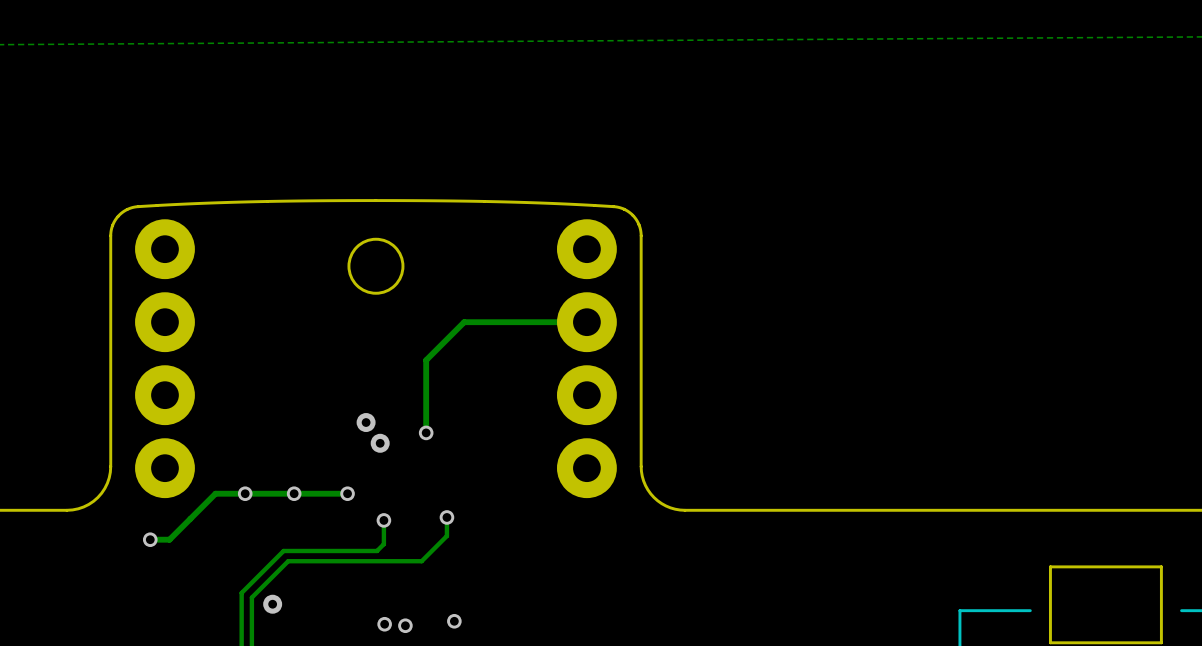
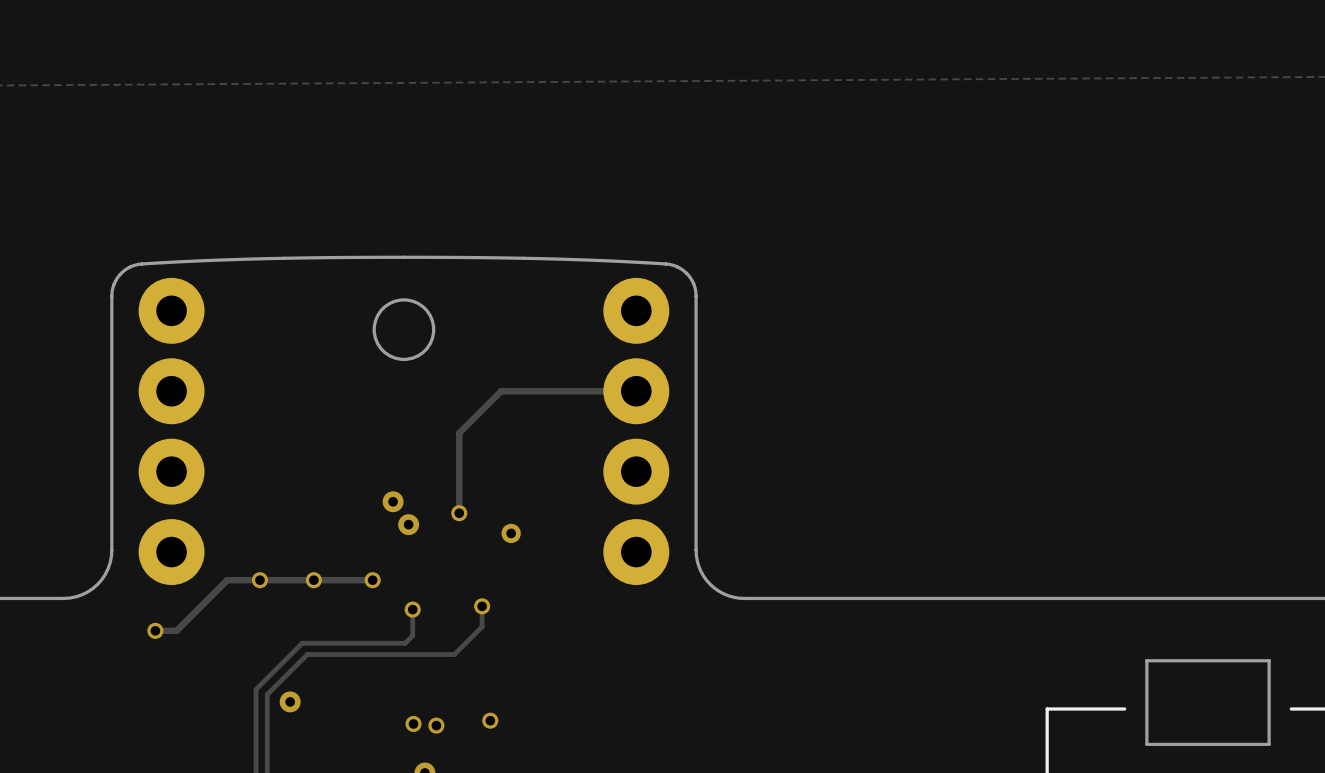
via: none -> (511, 533)

